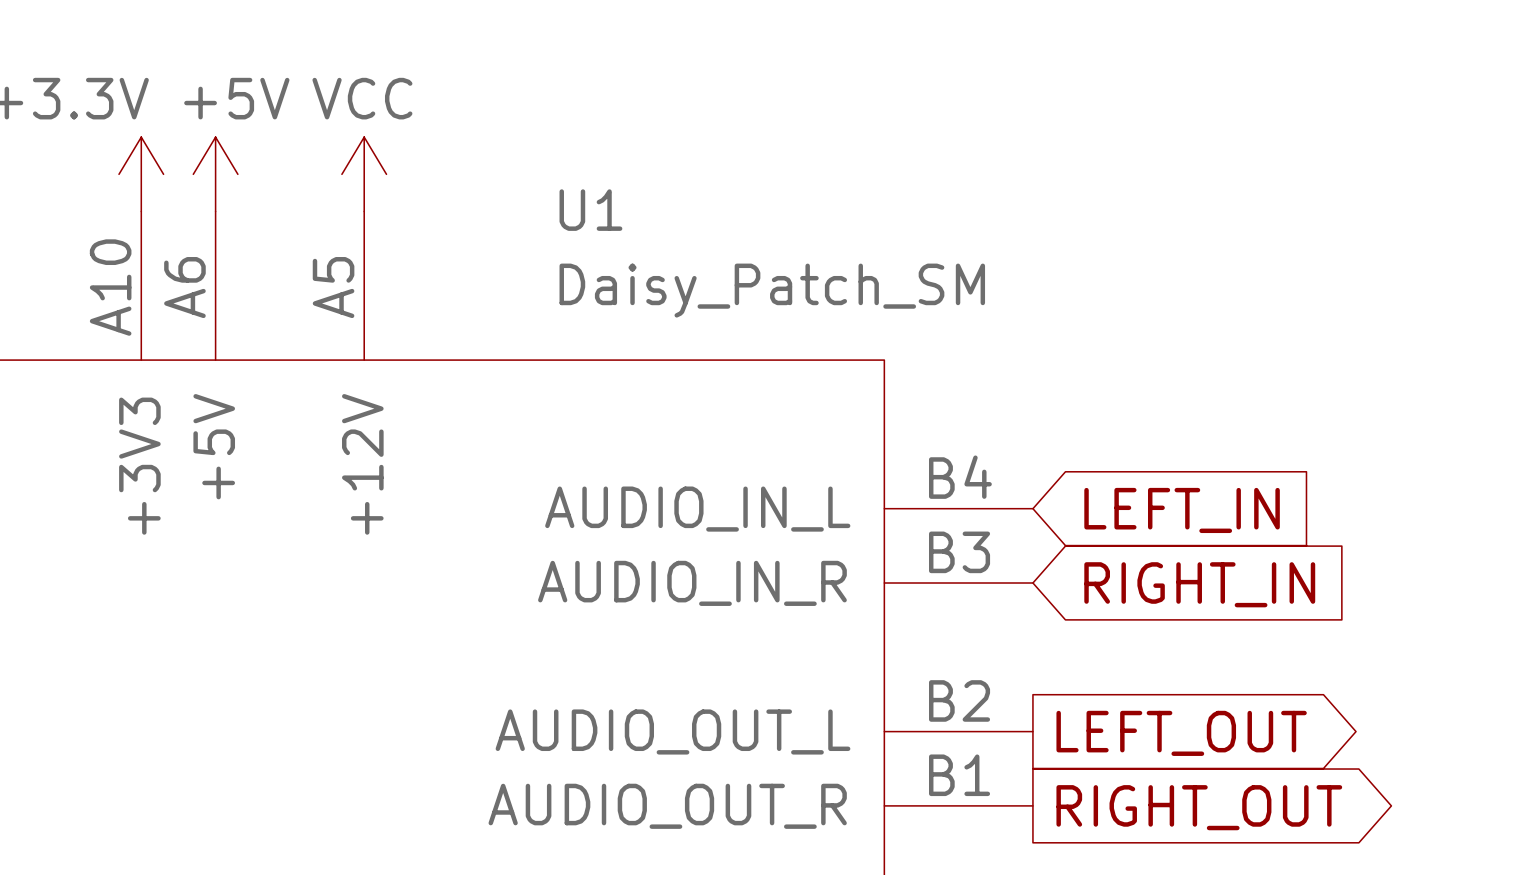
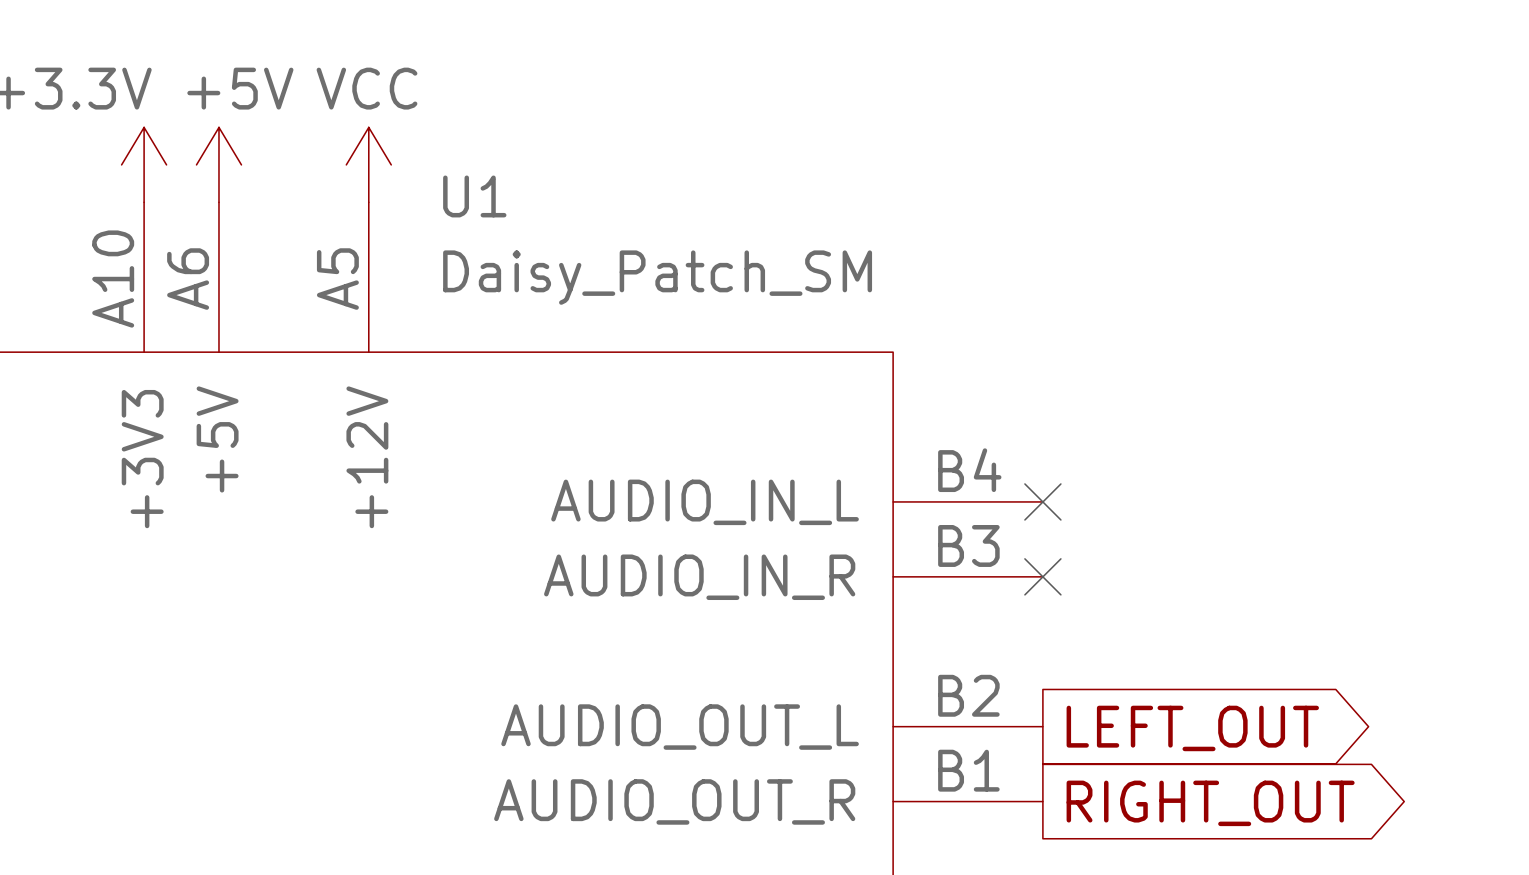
U1 name position: U1 (590, 210) -> U1 (474, 196)
U1 value position: Daisy_Patch_SM (772, 290) -> Daisy_Patch_SM (657, 277)
no-connect mark: none -> (1042, 501)
global label: LEFT_IN (1182, 510) -> none
no-connect mark: none -> (1042, 576)
global label: RIGHT_IN (1199, 584) -> none

